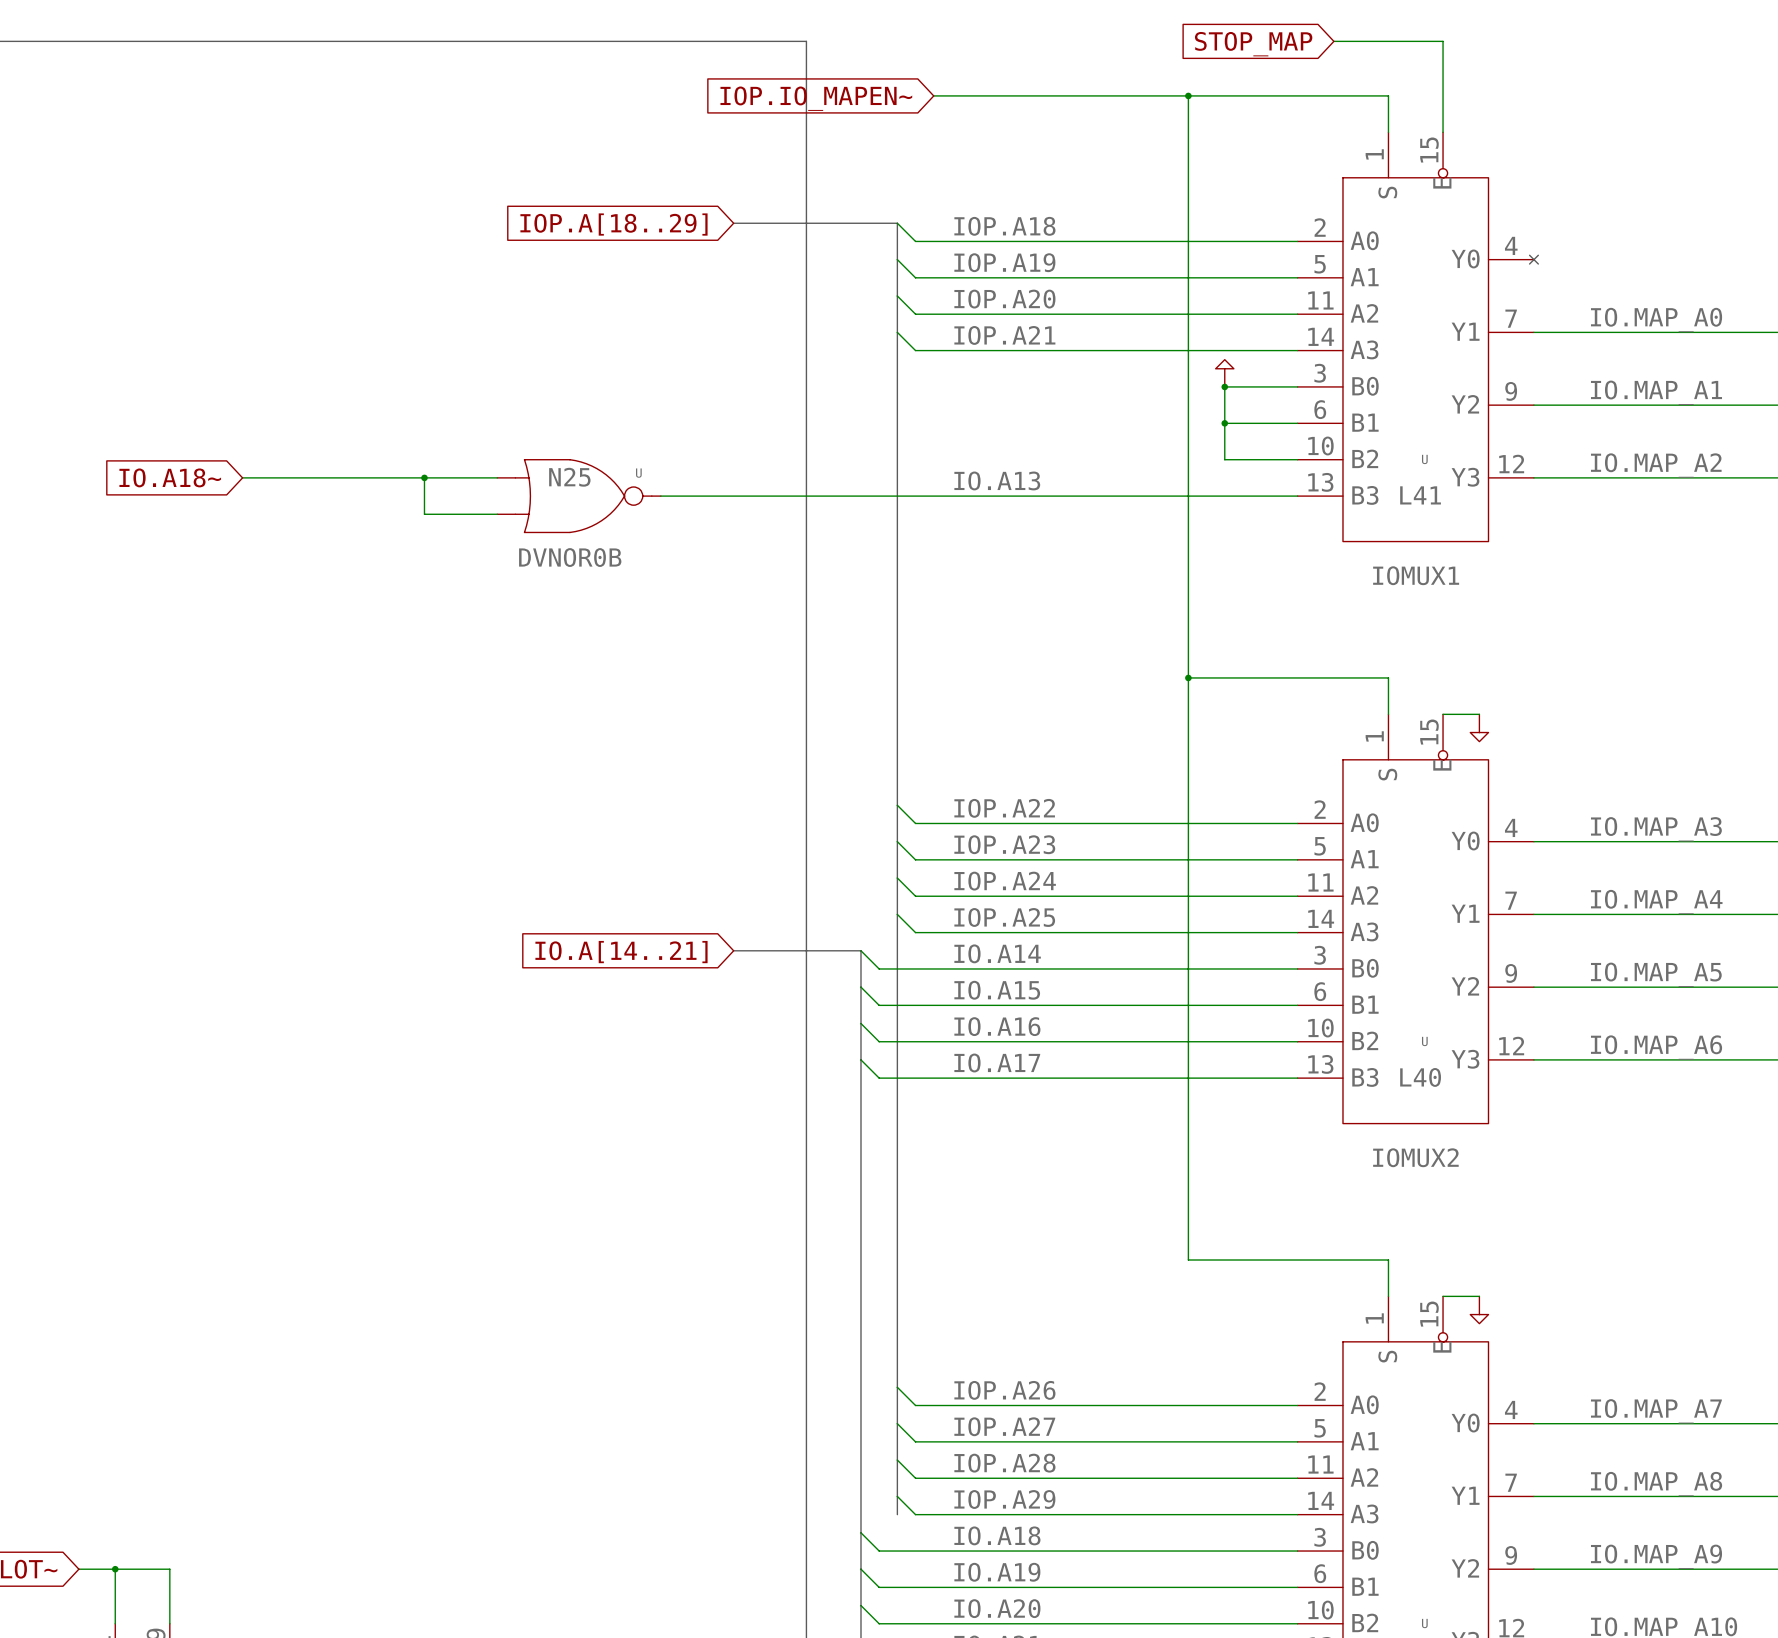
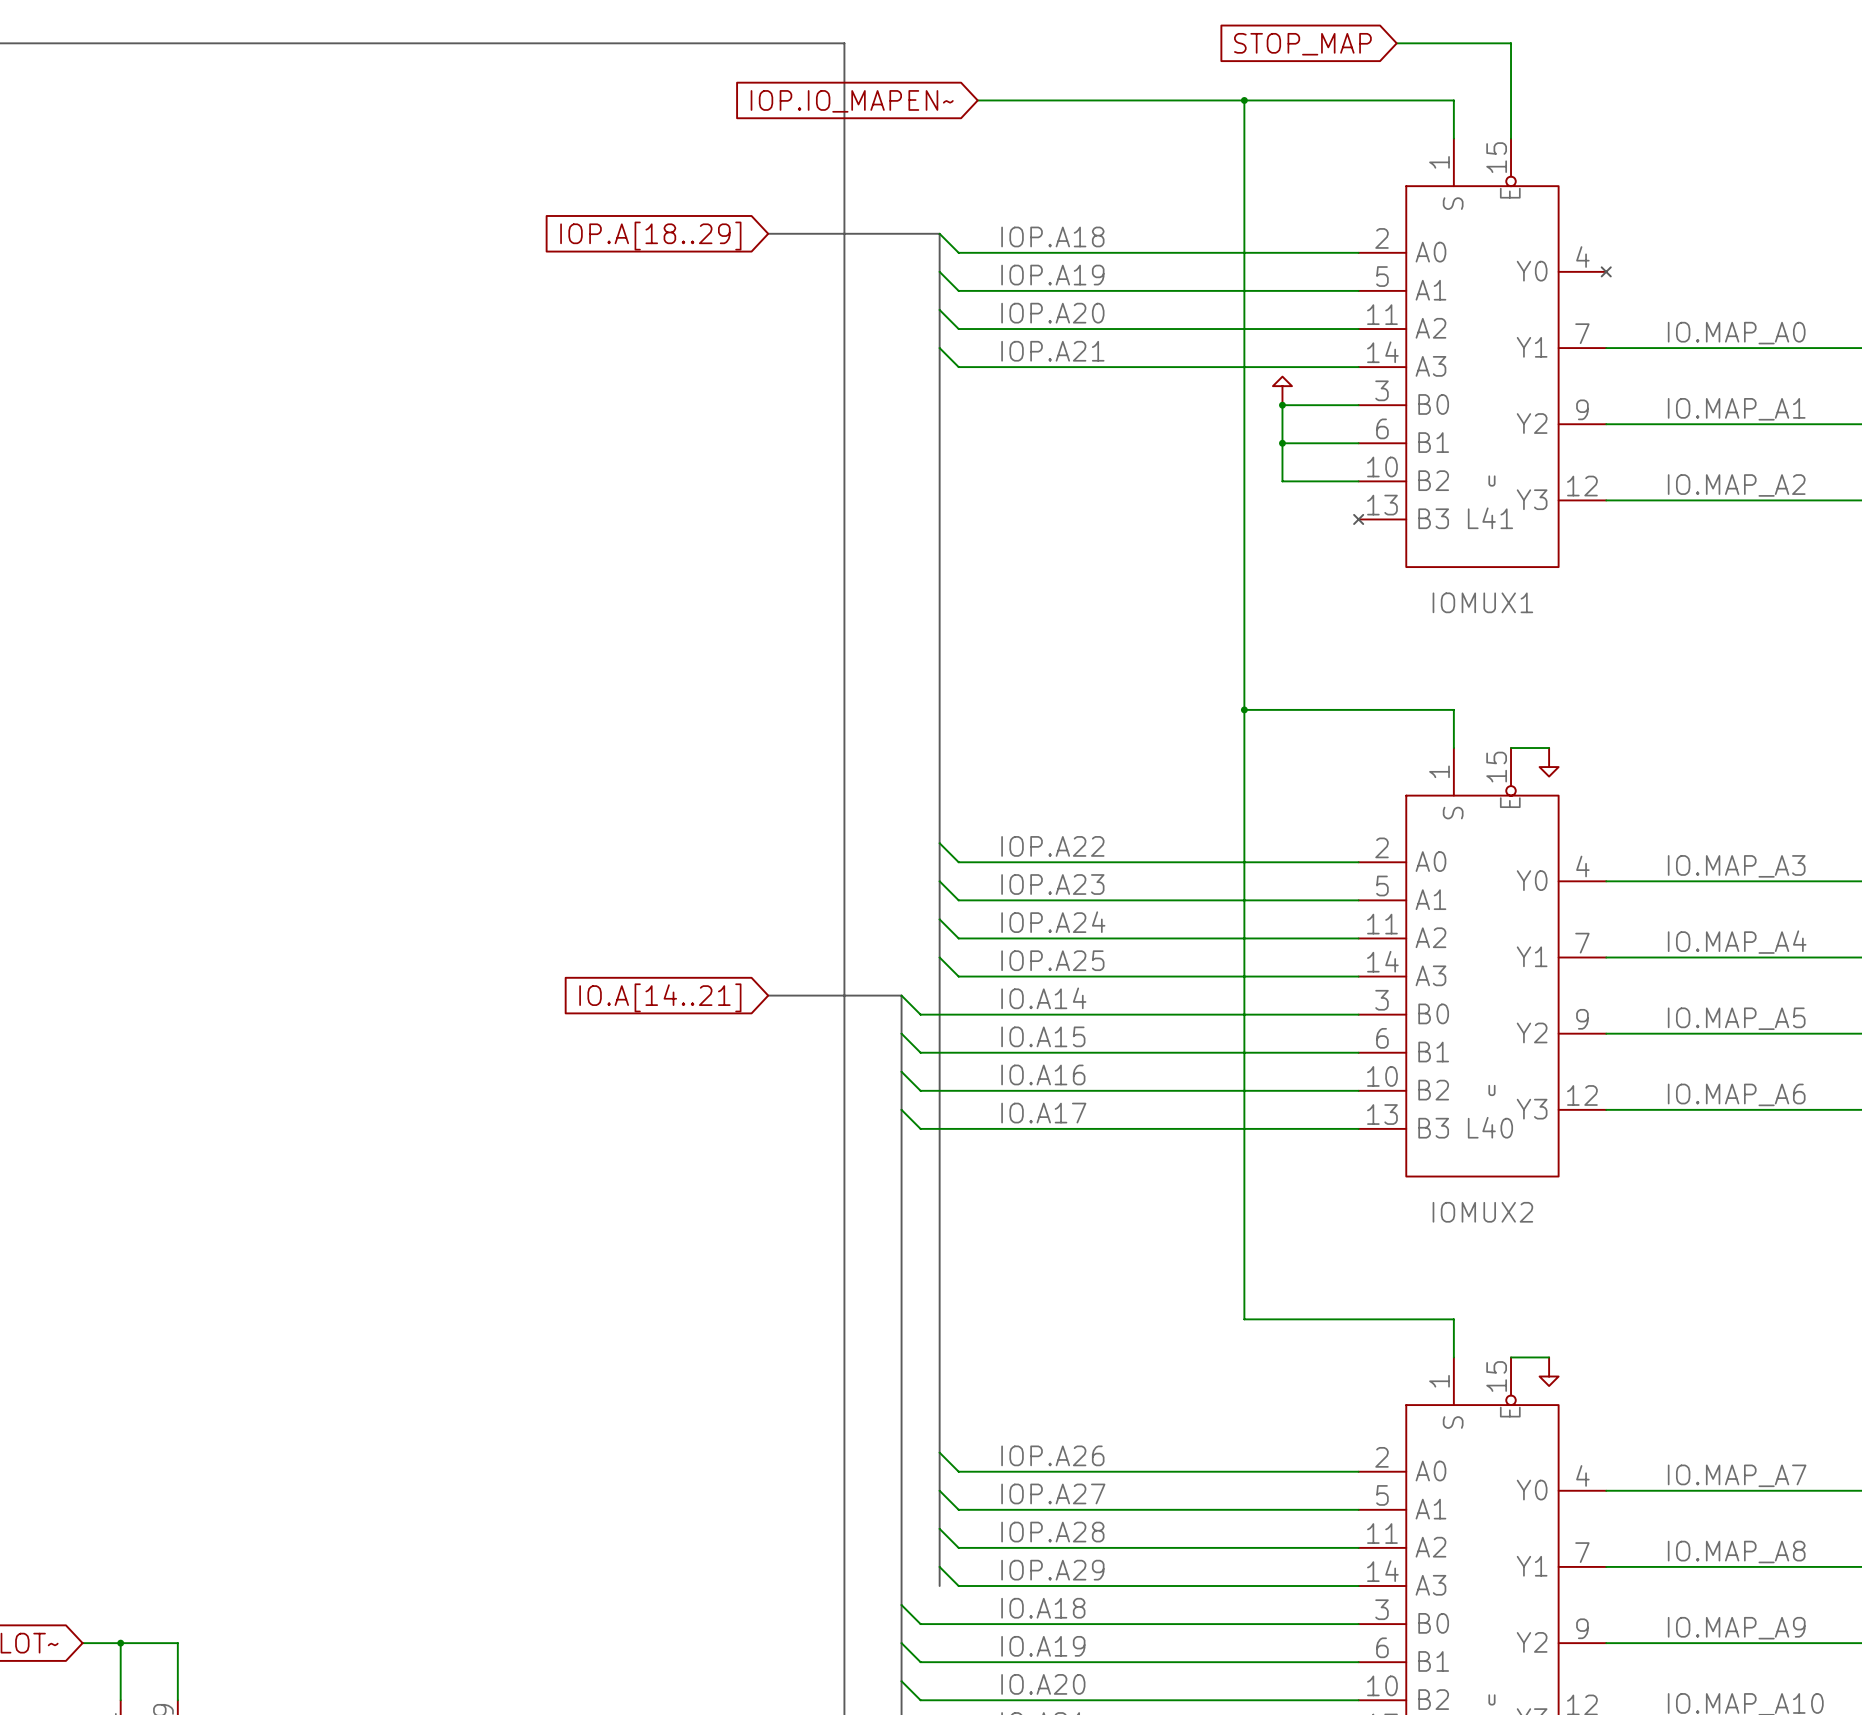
global label: IO.A18~ (170, 477) -> none
wire: (242, 477) (497, 477) -> none
wire: (424, 477) (424, 514) (497, 514) -> none
junction: (424, 477) -> none
label: IO.A13 (997, 480) -> none
U: (579, 496) -> none
wire: (660, 496) (1297, 496) -> none
no-connect mark: none -> (1358, 519)

